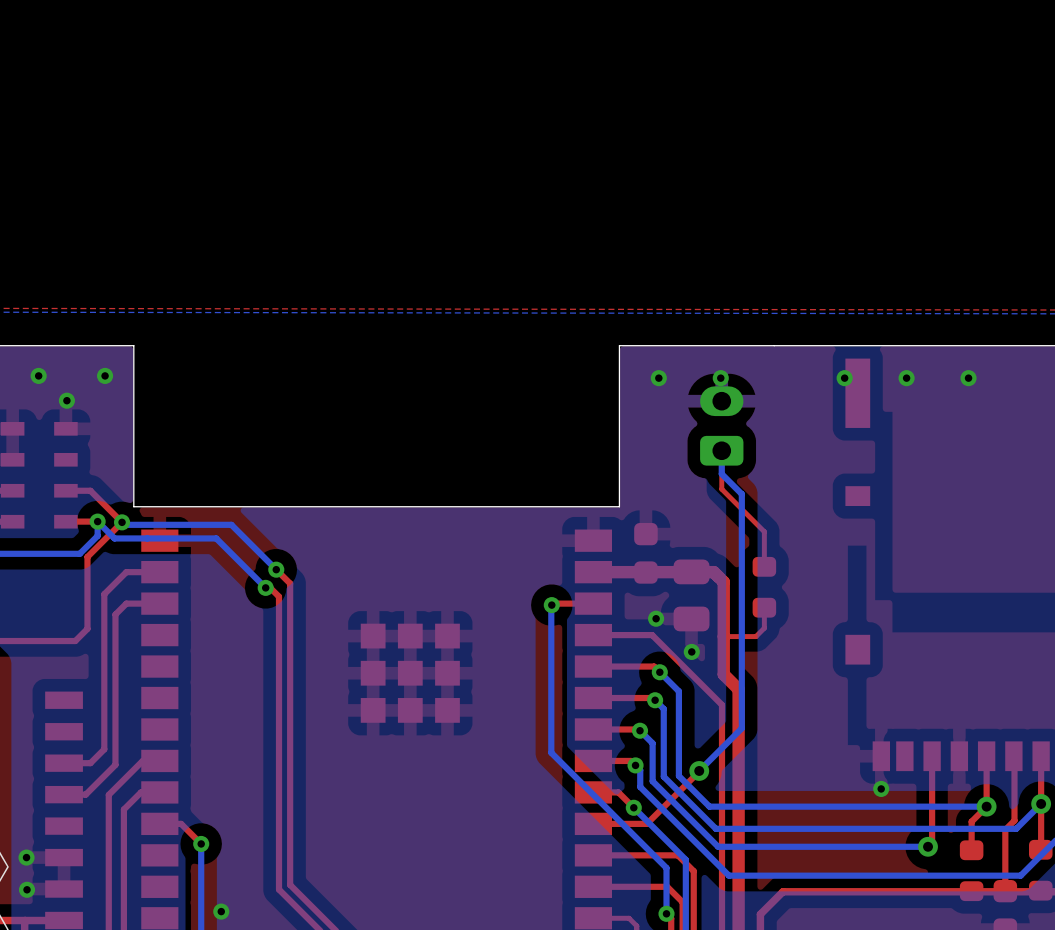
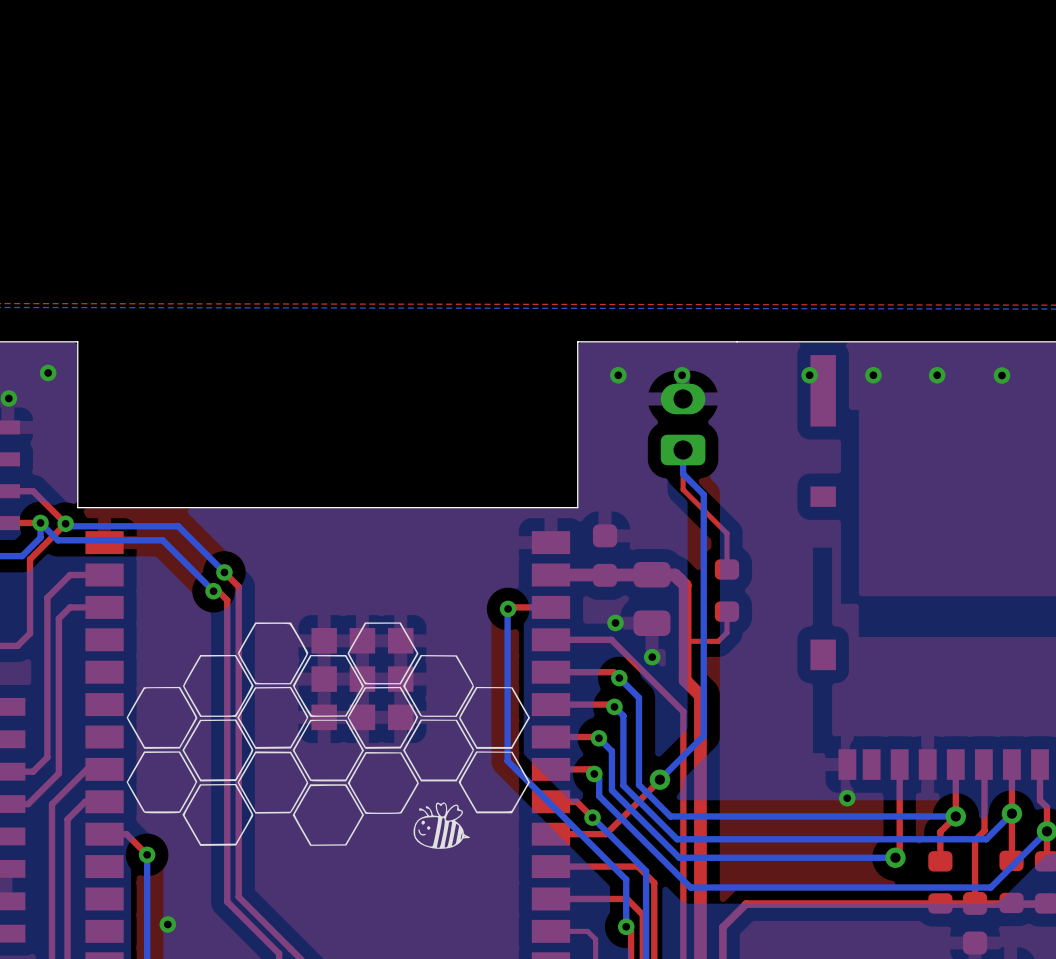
via: none -> (1001, 375)
drawing: none -> [126, 622, 531, 849]

